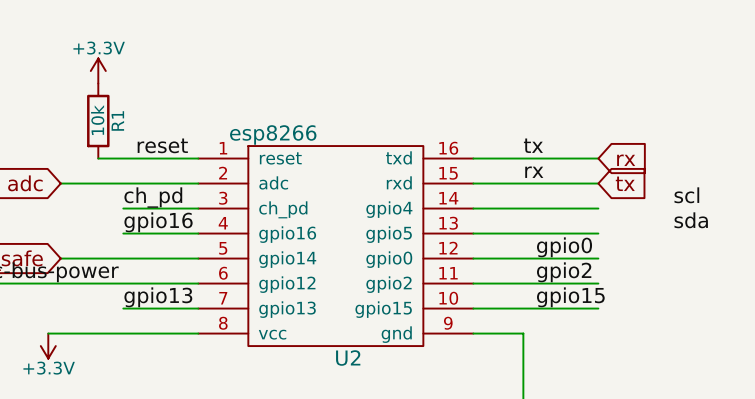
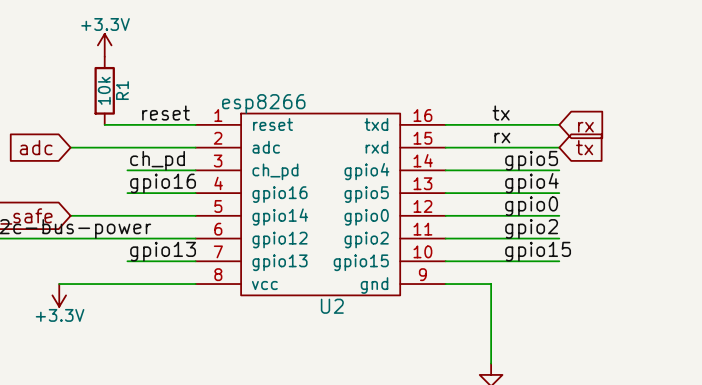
label: scl (686, 195) -> none
label: none -> gpio5 (531, 160)
label: sda (691, 220) -> none
label: none -> gpio4 (531, 183)

